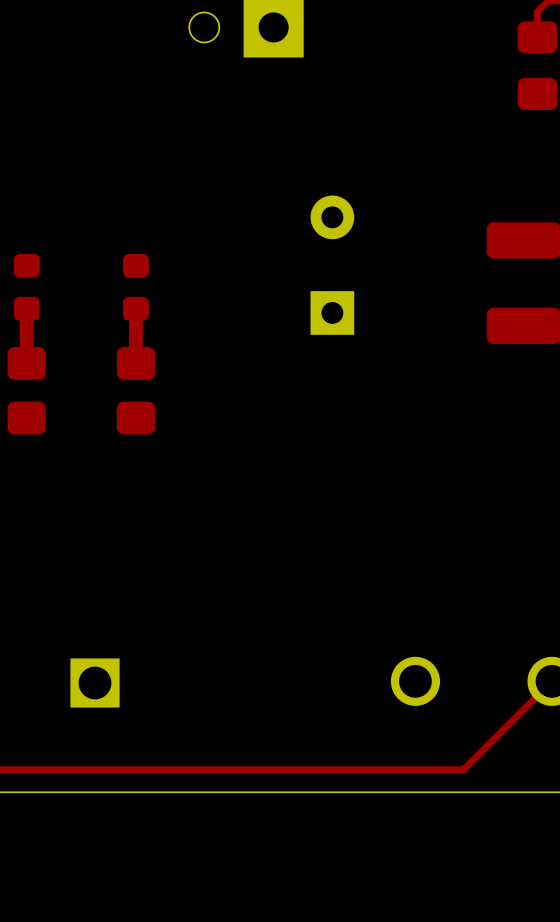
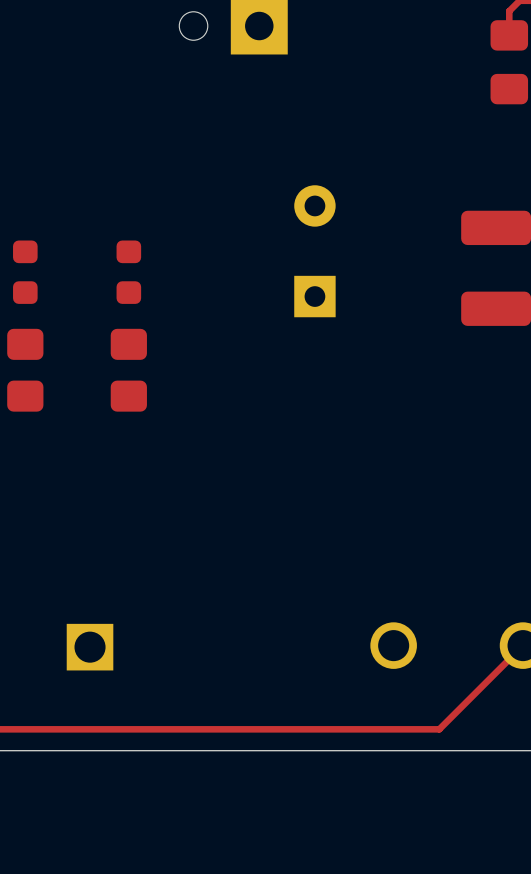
top track: (26, 308) (26, 363) -> none
top track: (135, 308) (135, 363) -> none

